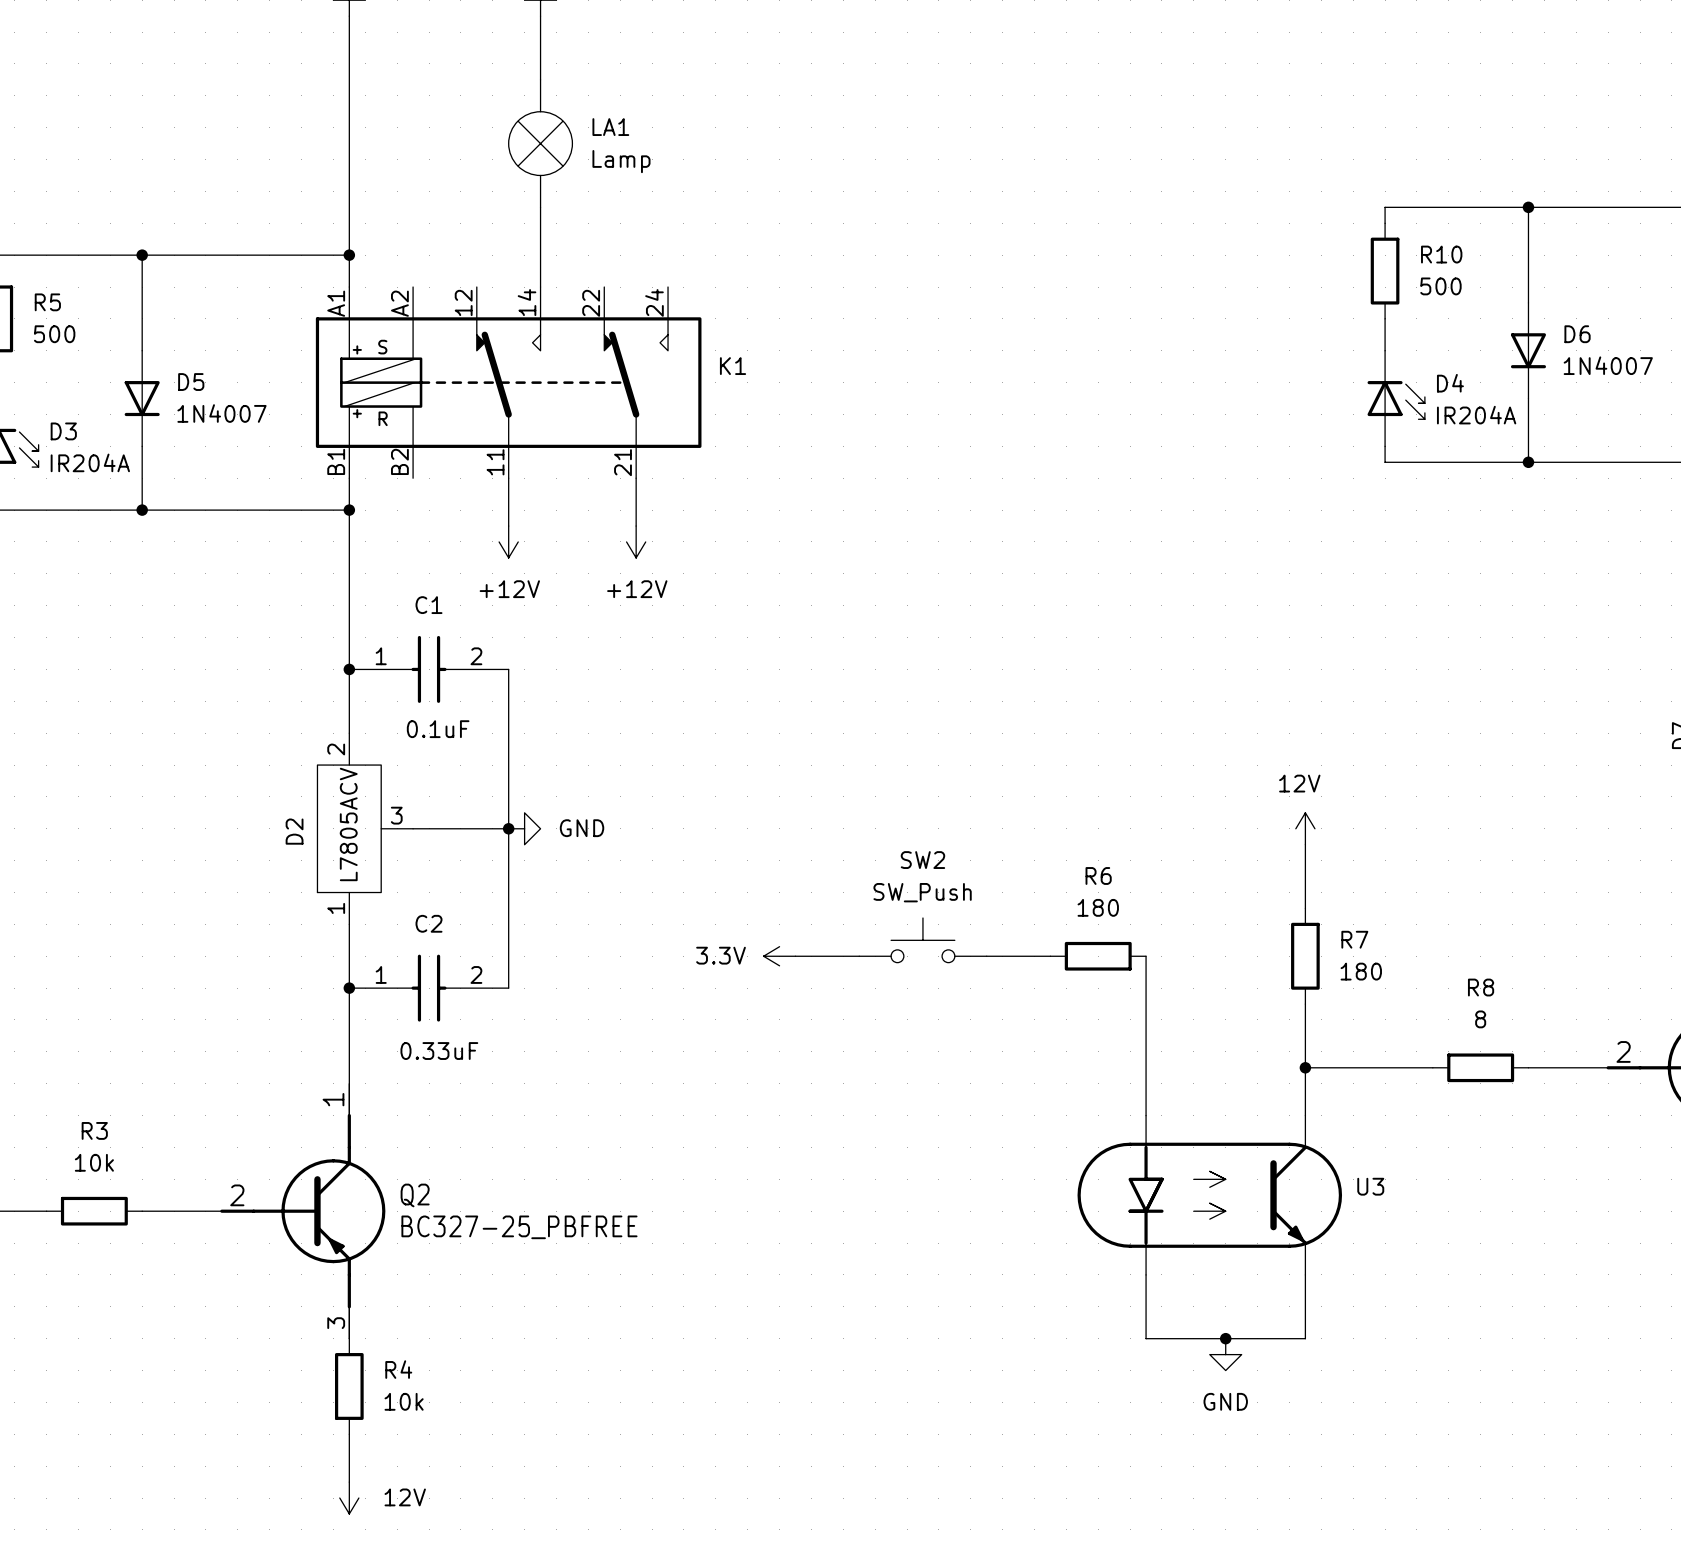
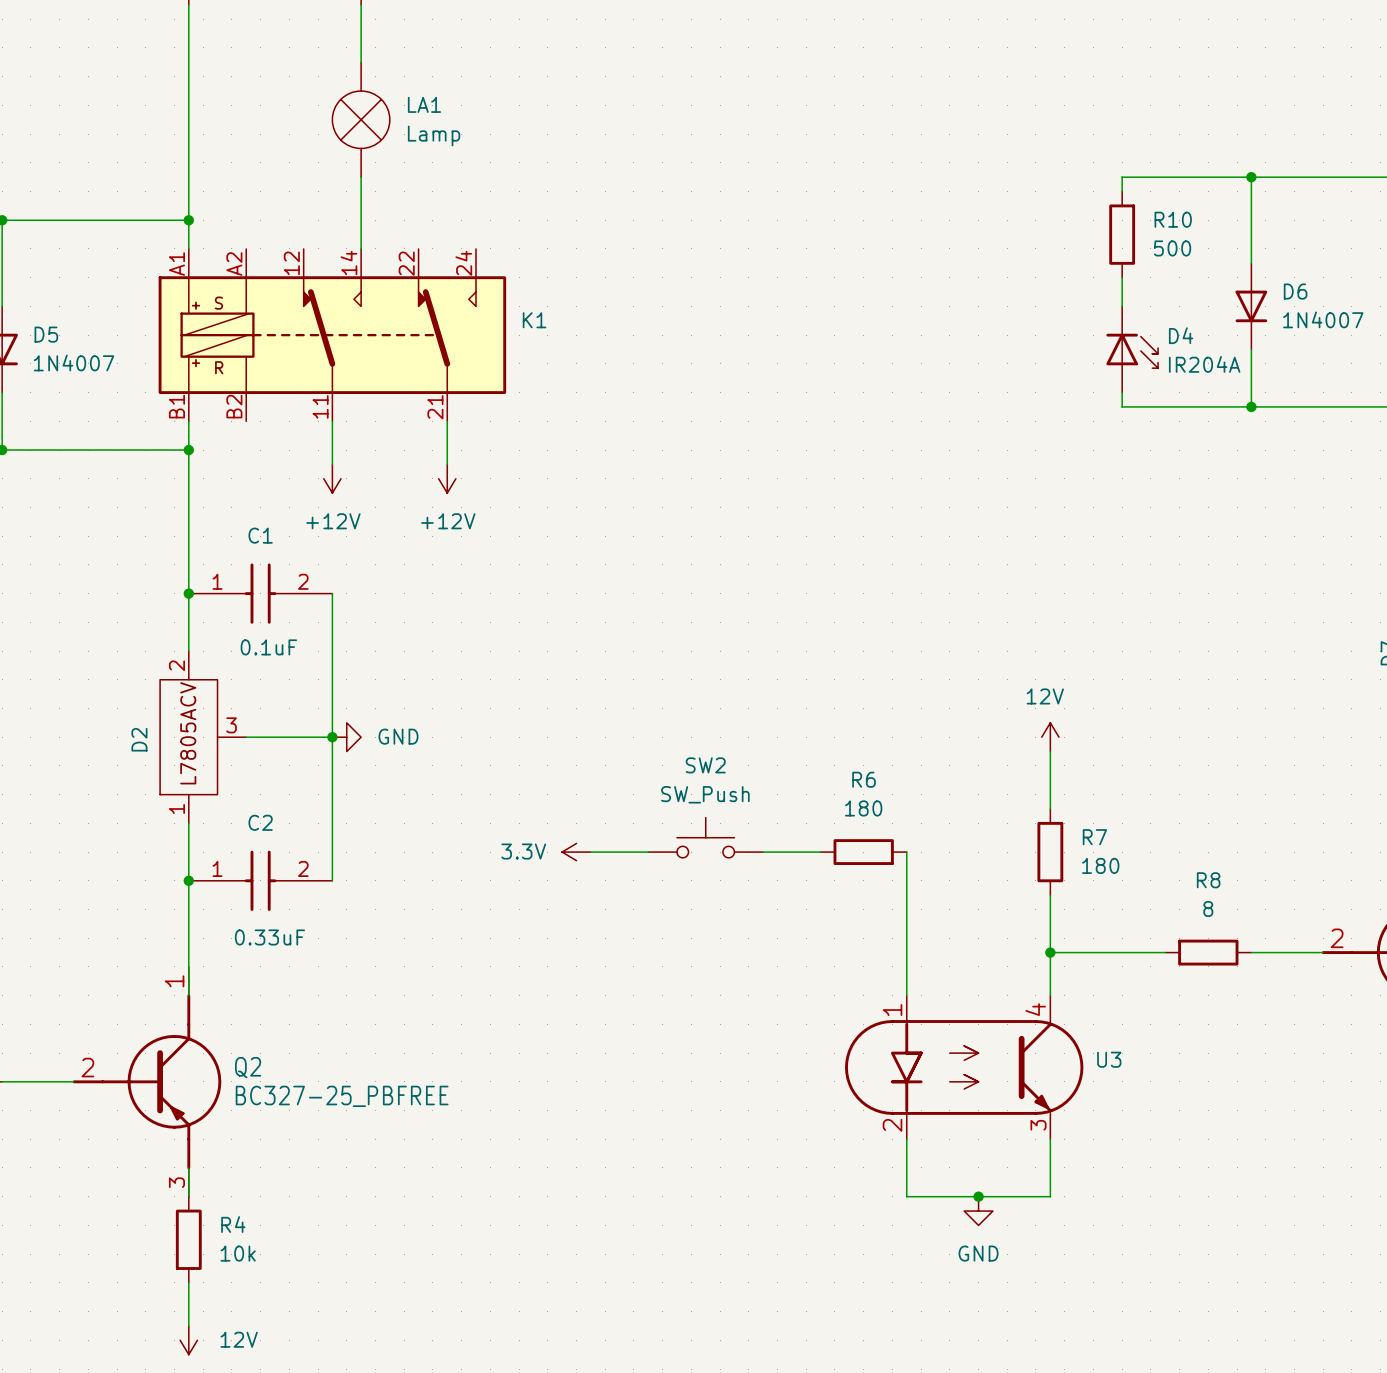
U3 pin number: none -> 1 (892, 1010)
U3 pin number: none -> 4 (1035, 1009)
U3 pin number: none -> 2 (892, 1125)
U3 pin number: none -> 3 (1038, 1125)

